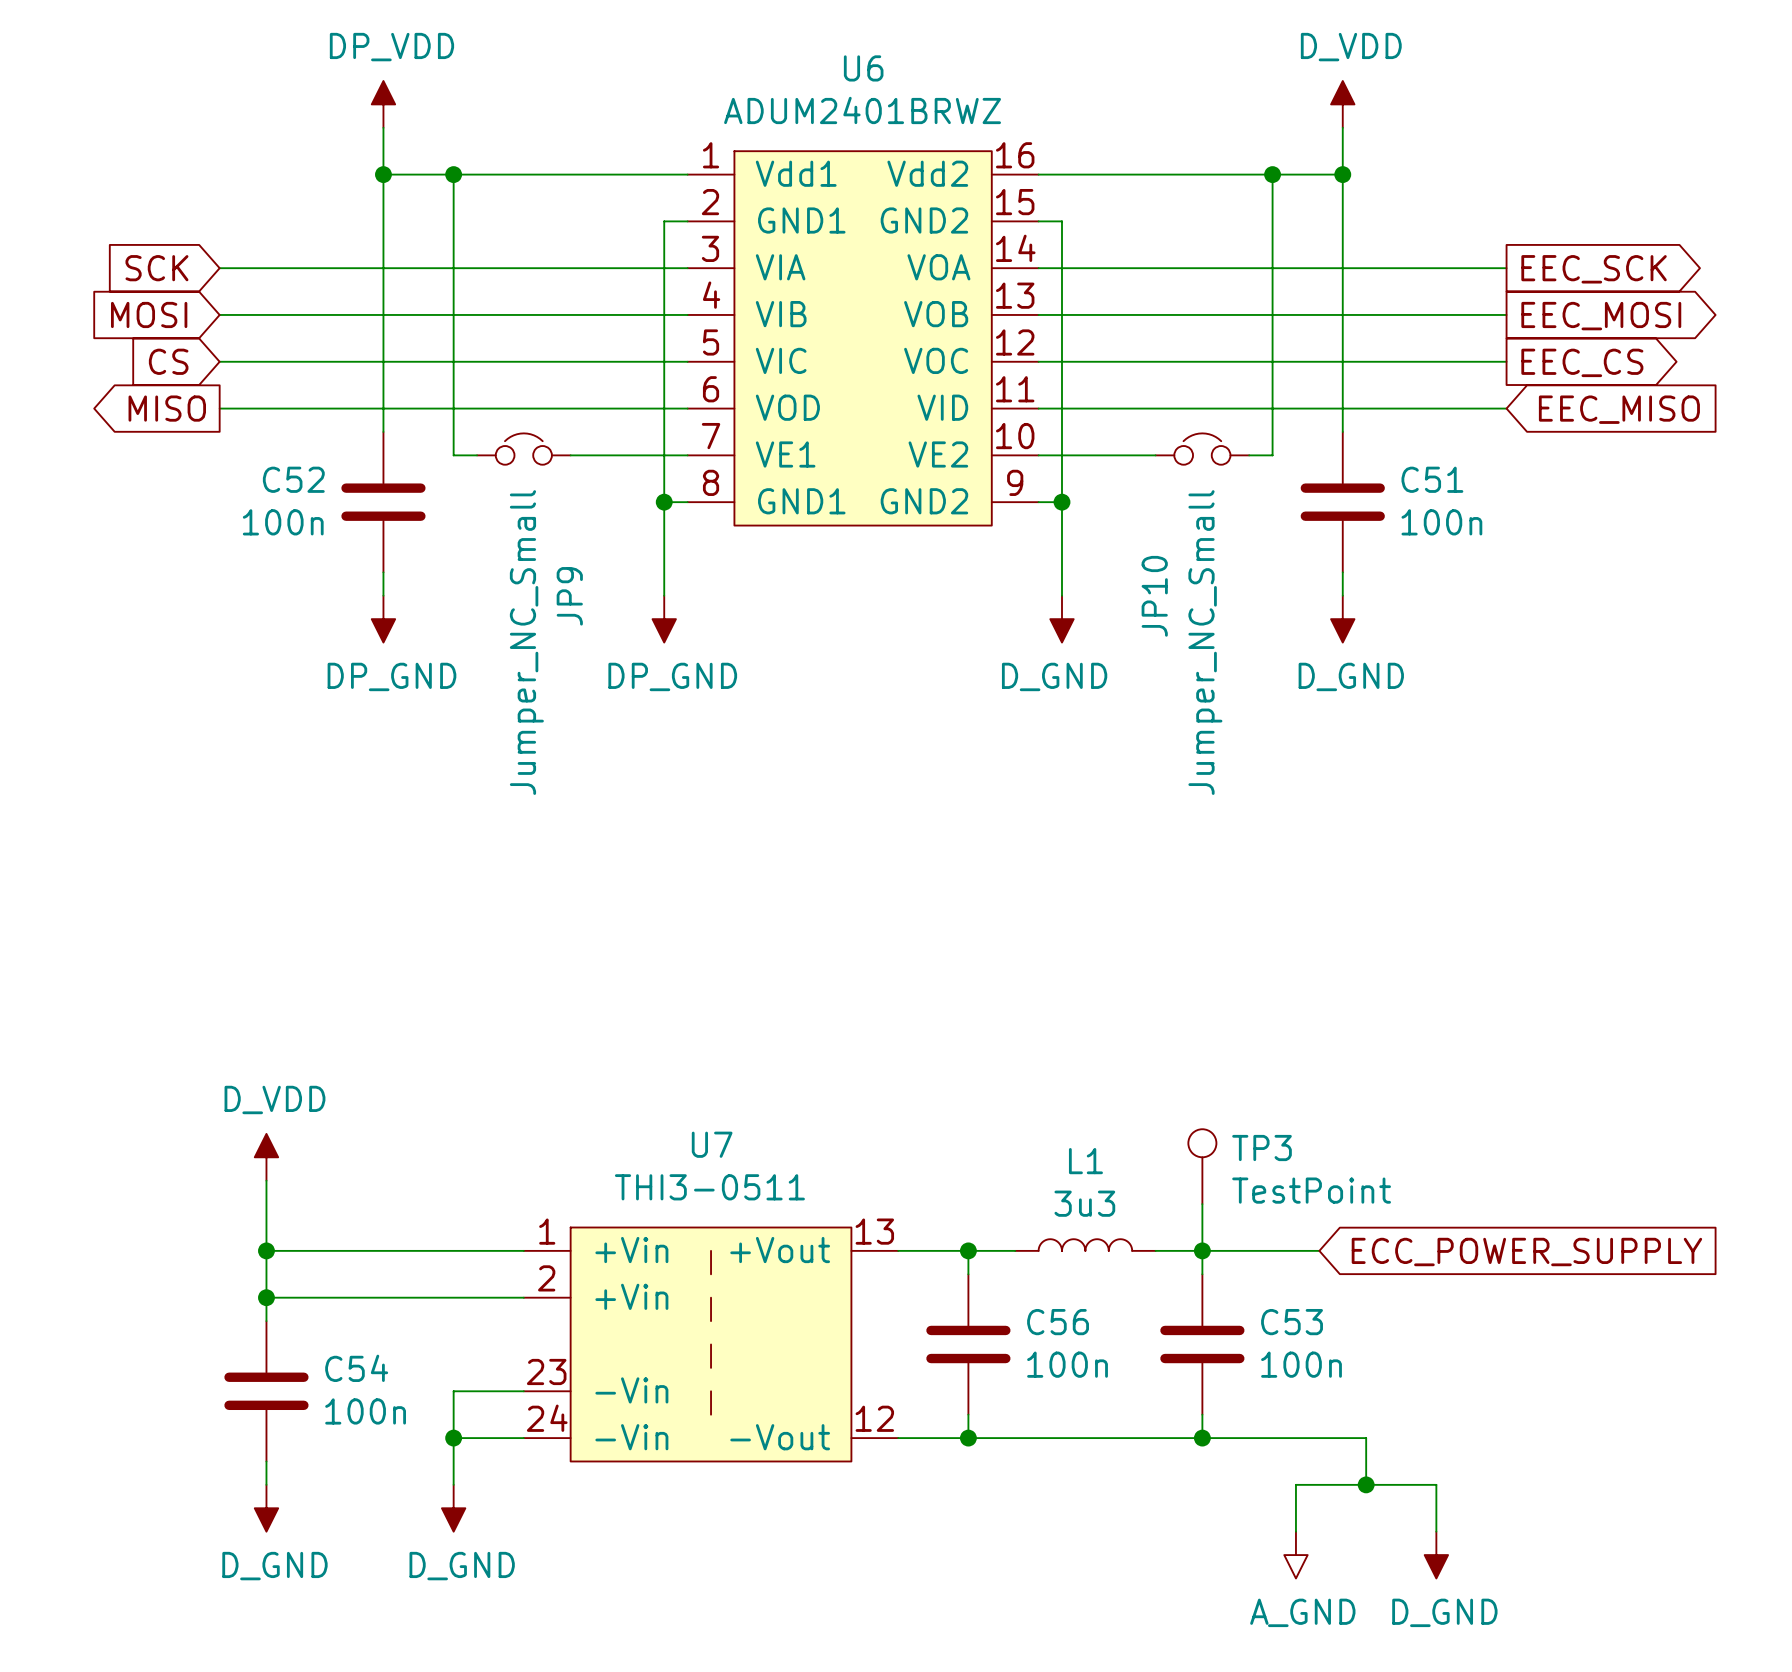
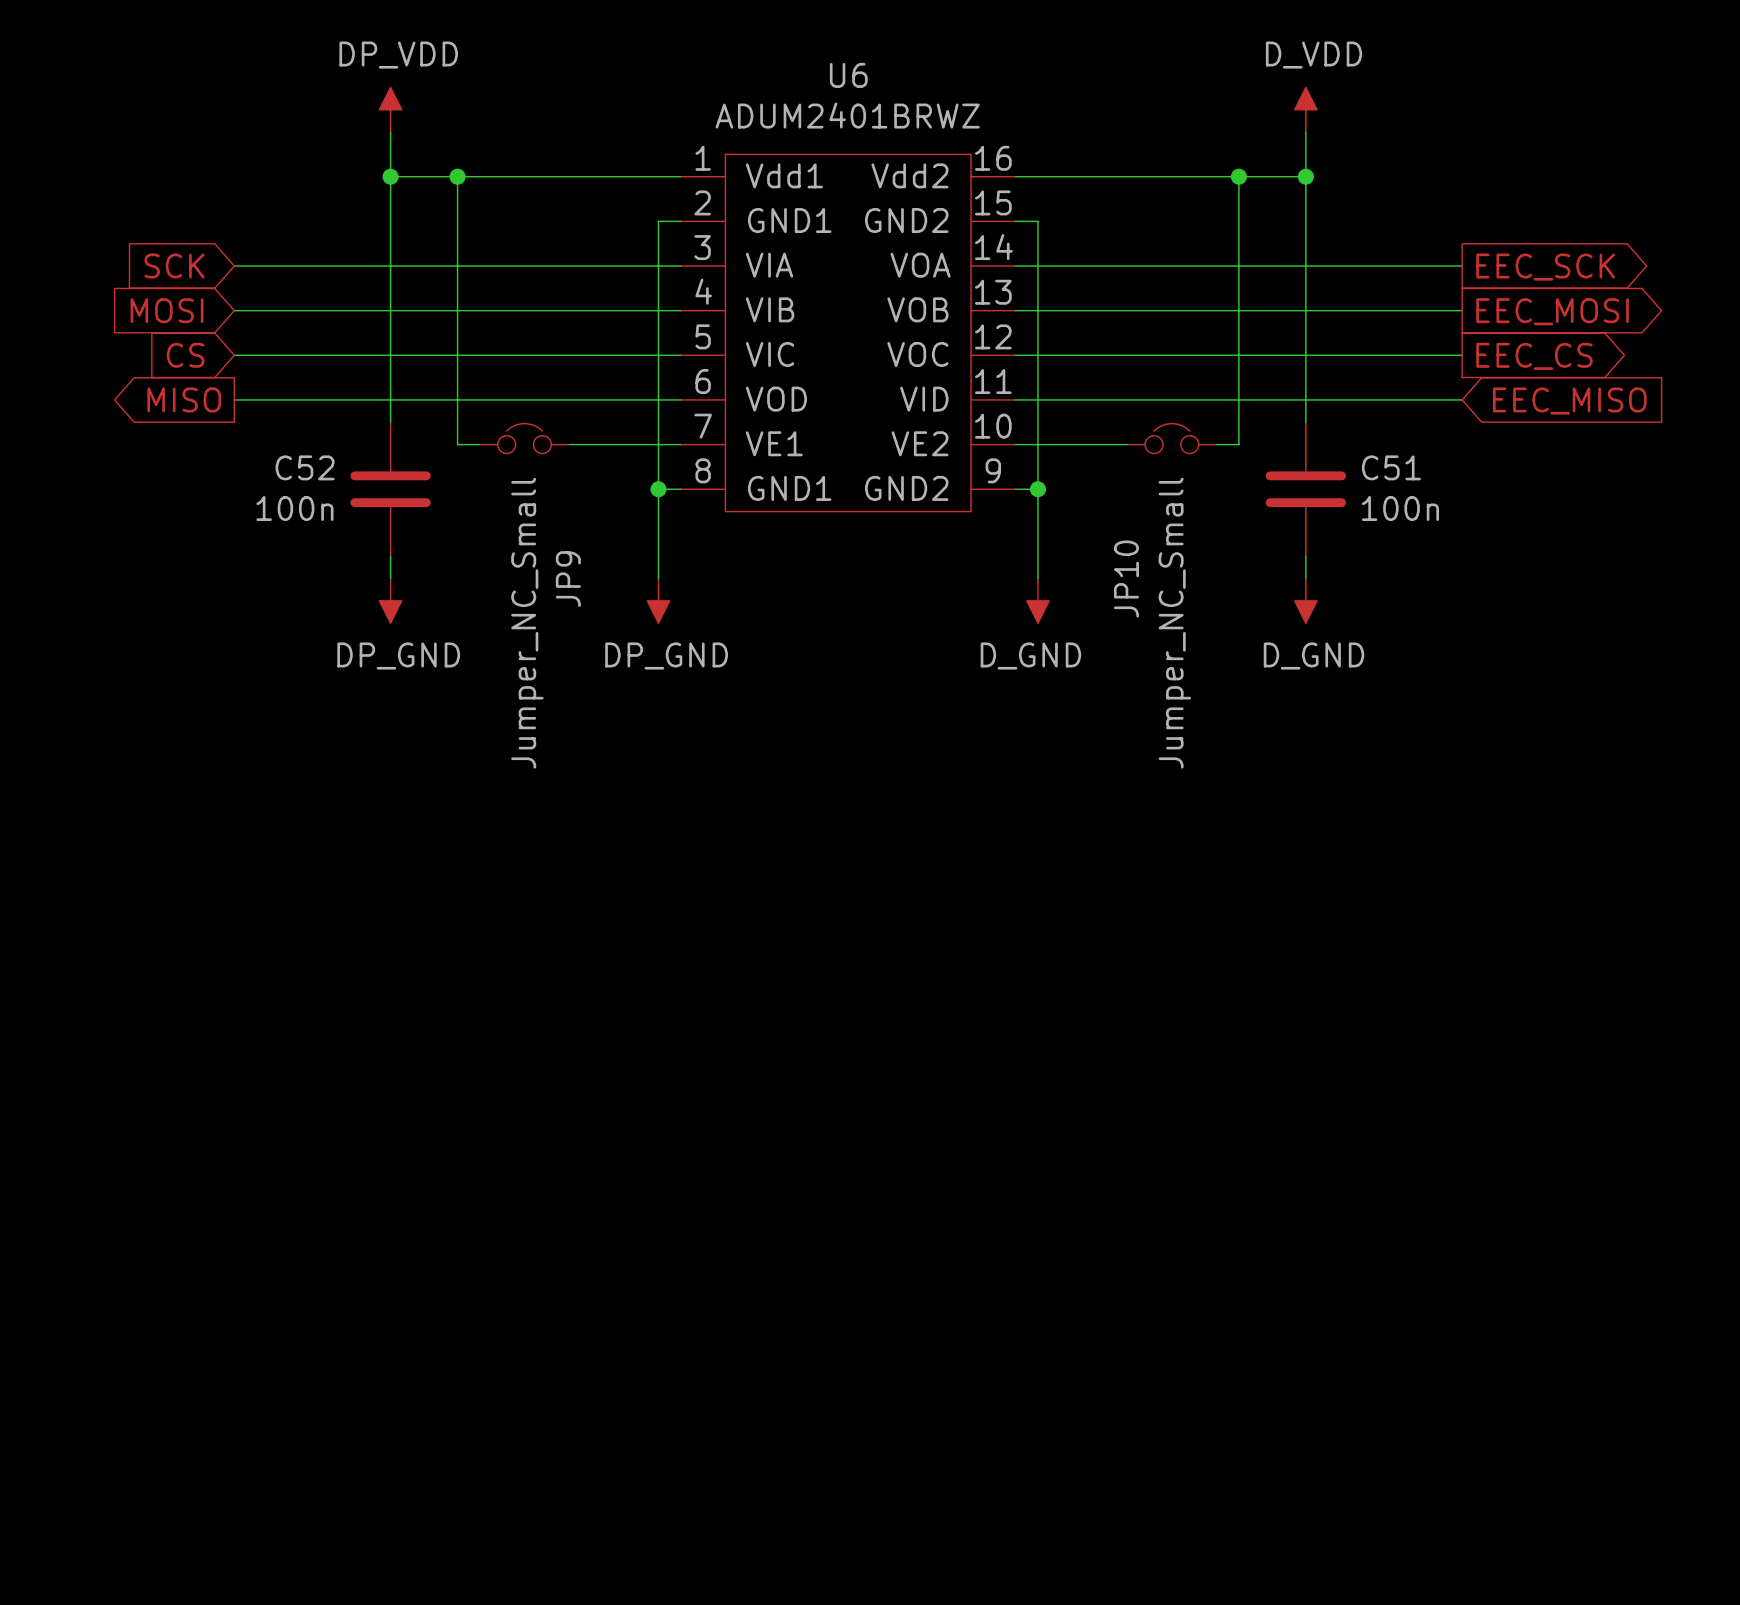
power symbol: D_VDD (266, 1157) -> none
TP3: TestPoint (1202, 1166) -> none
wire: (266, 1180) (266, 1321) -> none
wire: (1202, 1204) (1202, 1274) -> none
L1: 3u3 (1085, 1245) -> none
wire: (266, 1250) (523, 1250) -> none
junction: (266, 1250) -> none
wire: (898, 1250) (1015, 1250) -> none
wire: (968, 1250) (968, 1274) -> none
junction: (968, 1250) -> none
wire: (1155, 1250) (1319, 1250) -> none
junction: (1202, 1250) -> none
global label: ECC_POWER_SUPPLY (1526, 1252) -> none
wire: (266, 1297) (523, 1297) -> none
junction: (266, 1297) -> none
U7: THI3-0511 (711, 1344) -> none
C56: 100n (968, 1344) -> none
C53: 100n (1202, 1344) -> none
C54: 100n (266, 1391) -> none
wire: (523, 1391) (453, 1391) (453, 1484) -> none
wire: (968, 1414) (968, 1438) -> none
wire: (1202, 1414) (1202, 1438) -> none
wire: (453, 1438) (523, 1438) -> none
junction: (453, 1438) -> none
wire: (898, 1438) (1366, 1438) (1366, 1484) -> none
junction: (968, 1438) -> none
junction: (1202, 1438) -> none
wire: (266, 1461) (266, 1484) -> none
junction: (1366, 1484) -> none
power symbol: D_GND (266, 1508) -> none
power symbol: D_GND (453, 1508) -> none
wire: (1295, 1531) (1295, 1484) (1436, 1484) (1436, 1531) -> none
power symbol: A_GND (1295, 1555) -> none
power symbol: D_GND (1436, 1555) -> none

